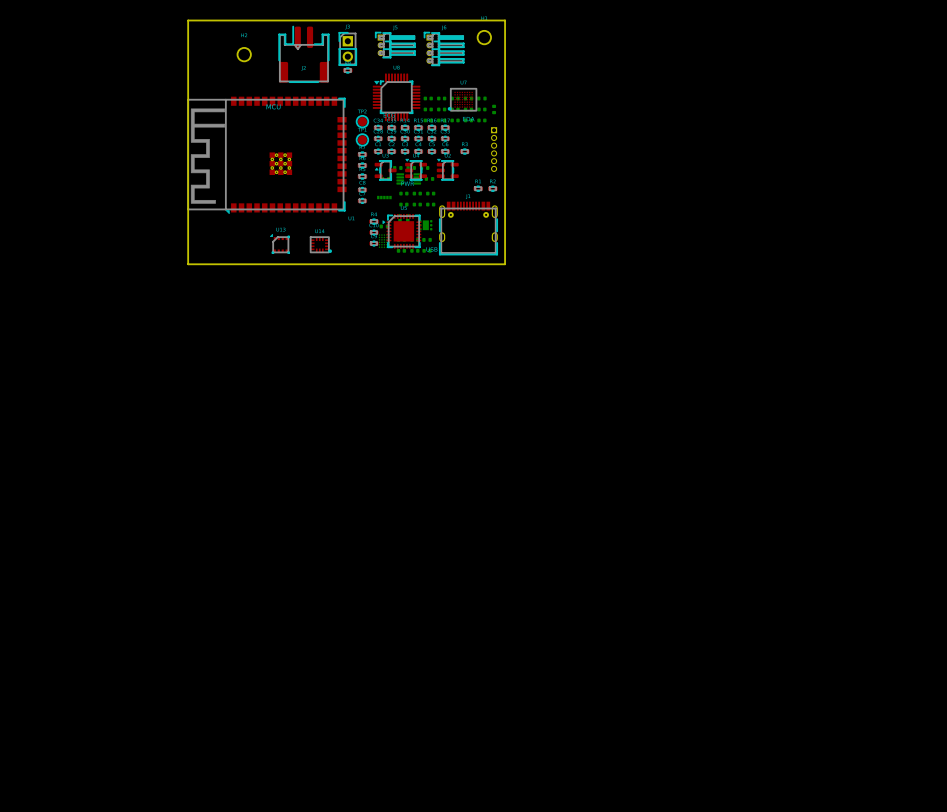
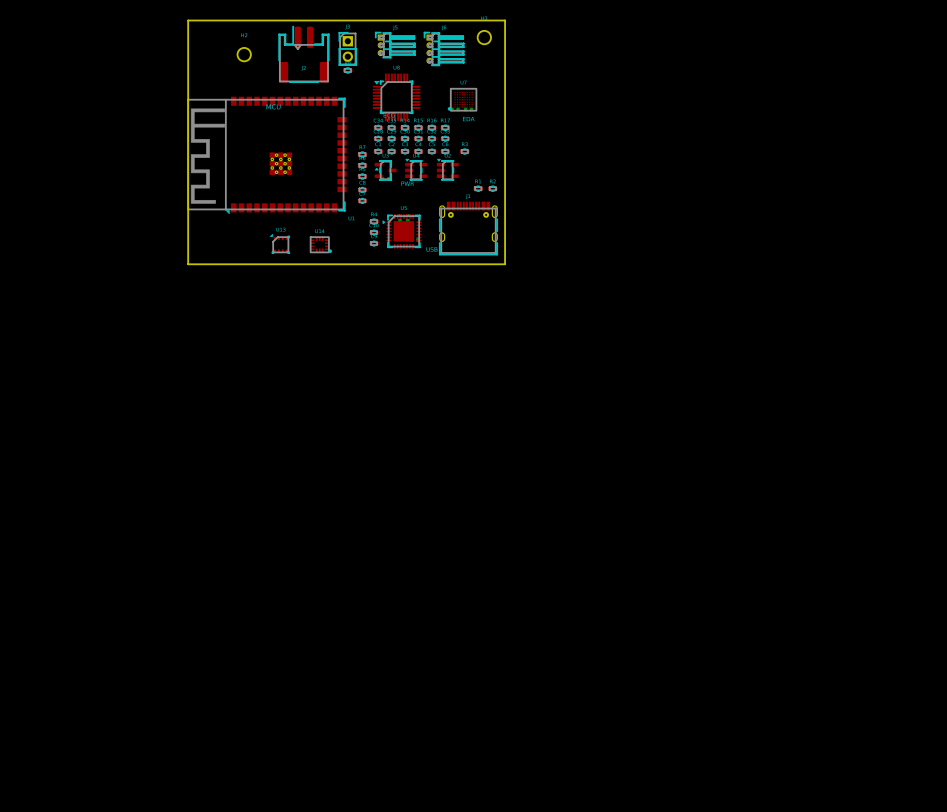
part: (428, 98) -> none
part: (441, 98) -> none
part: (455, 98) -> none
part: (468, 98) -> none
part: (481, 98) -> none
part: (428, 109) -> none
part: (441, 109) -> none
part: (481, 109) -> none
part: (494, 109) -> none
part: (428, 120) -> none
part: (441, 120) -> none
part: (455, 120) -> none
part: (468, 120) -> none
part: (481, 120) -> none
part: (362, 121) -> none
part: (362, 139) -> none
part: (494, 149) -> none
part: (397, 167) -> none
part: (411, 167) -> none
part: (424, 167) -> none
part: (408, 178) -> none
part: (429, 178) -> none
part: (403, 193) -> none
part: (417, 193) -> none
part: (430, 193) -> none
part: (384, 197) -> none
part: (403, 204) -> none
part: (417, 204) -> none
part: (430, 204) -> none
part: (425, 225) -> none
part: (384, 226) -> none
part: (427, 239) -> none
part: (384, 241) -> none
part: (401, 250) -> none
part: (414, 250) -> none
part: (427, 250) -> none

